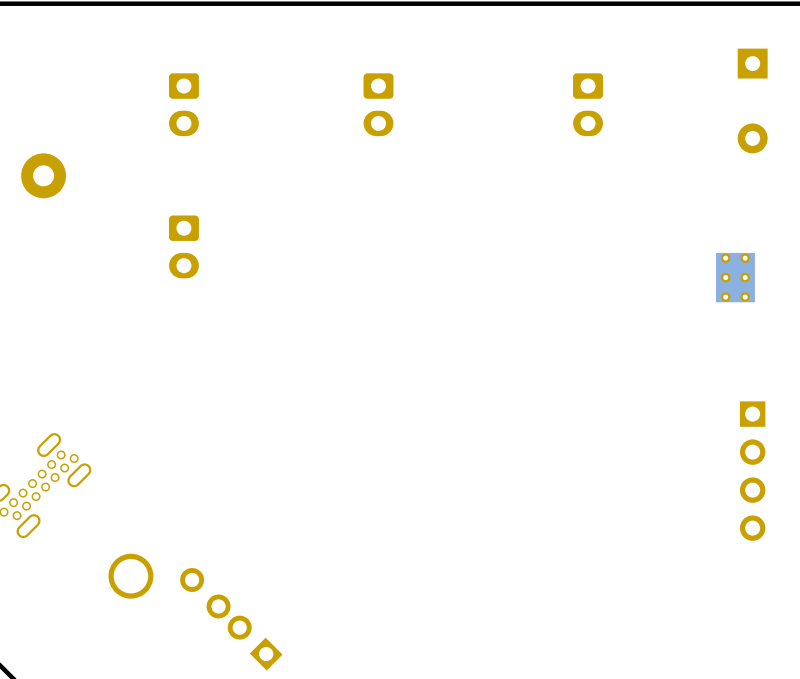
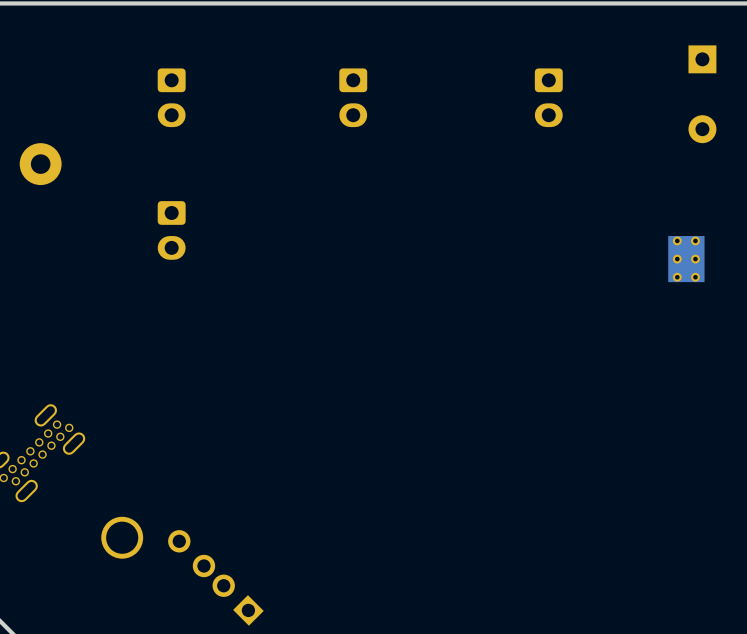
part: (752, 471) -> none

